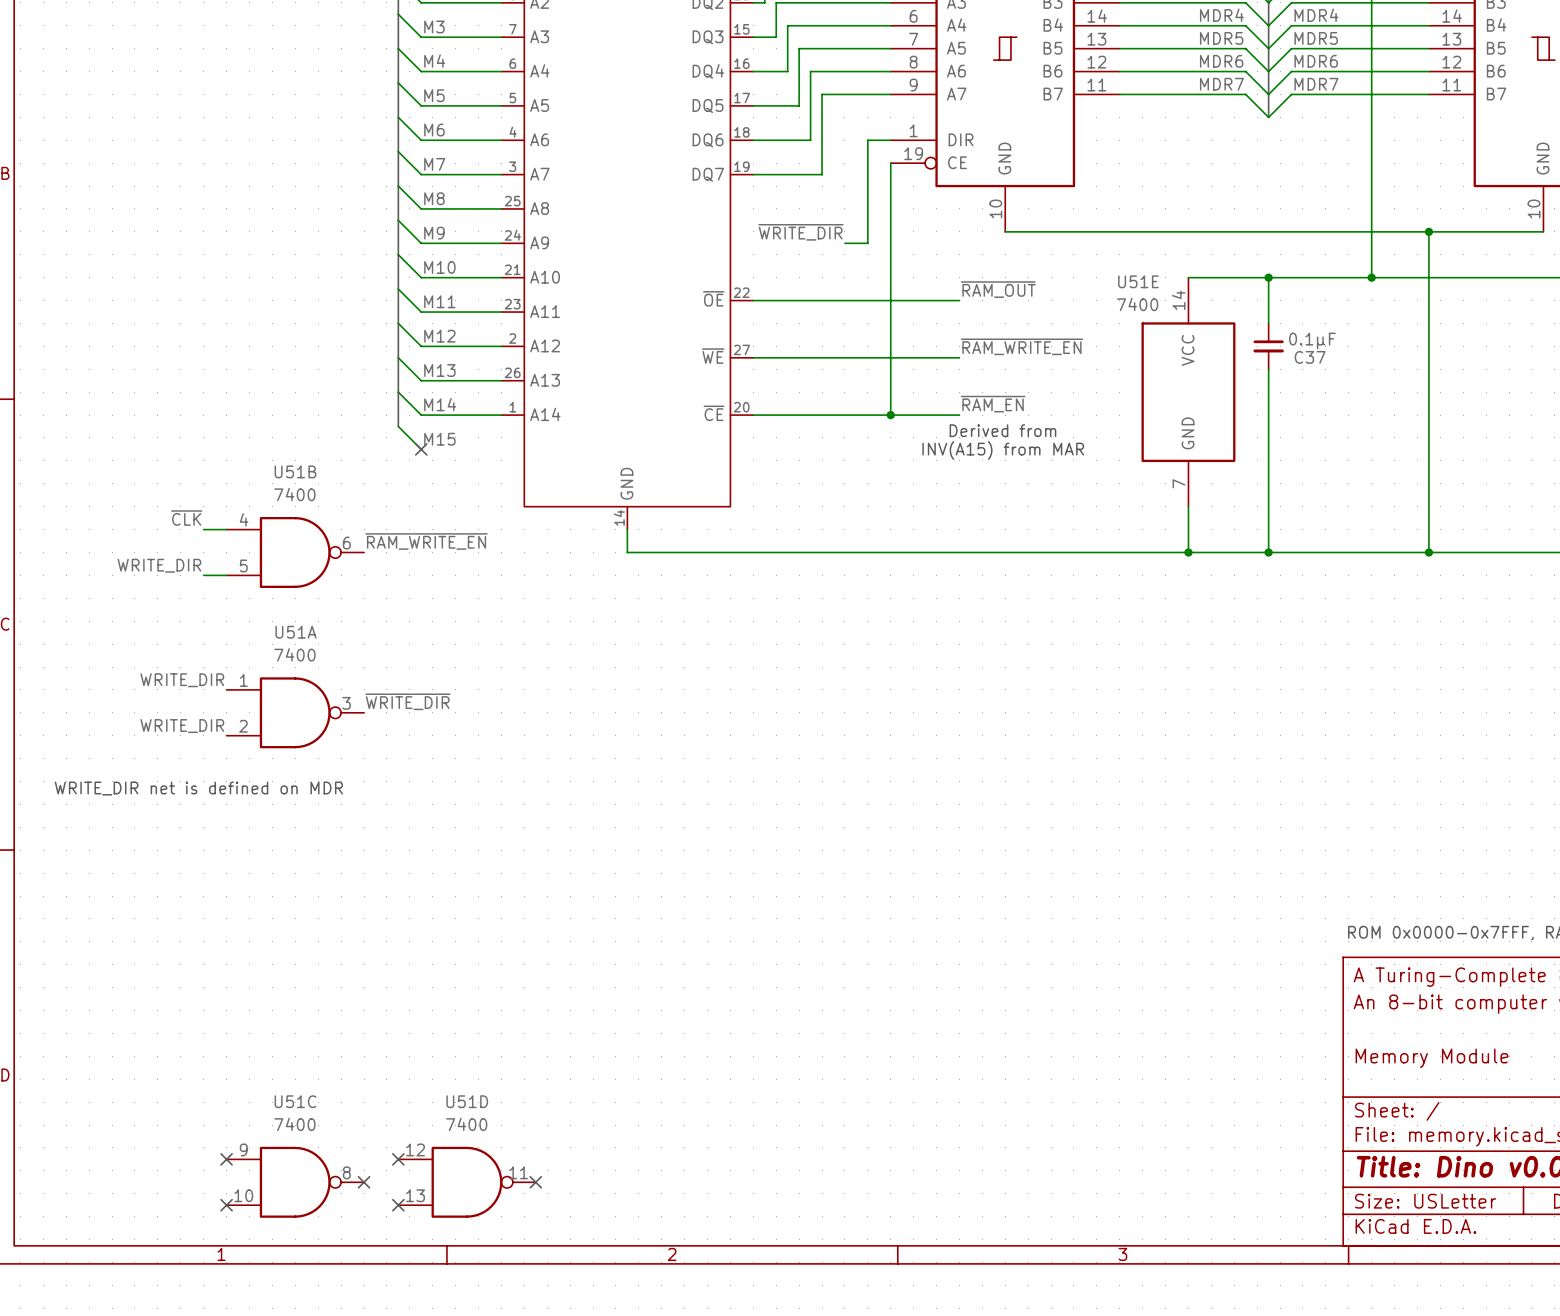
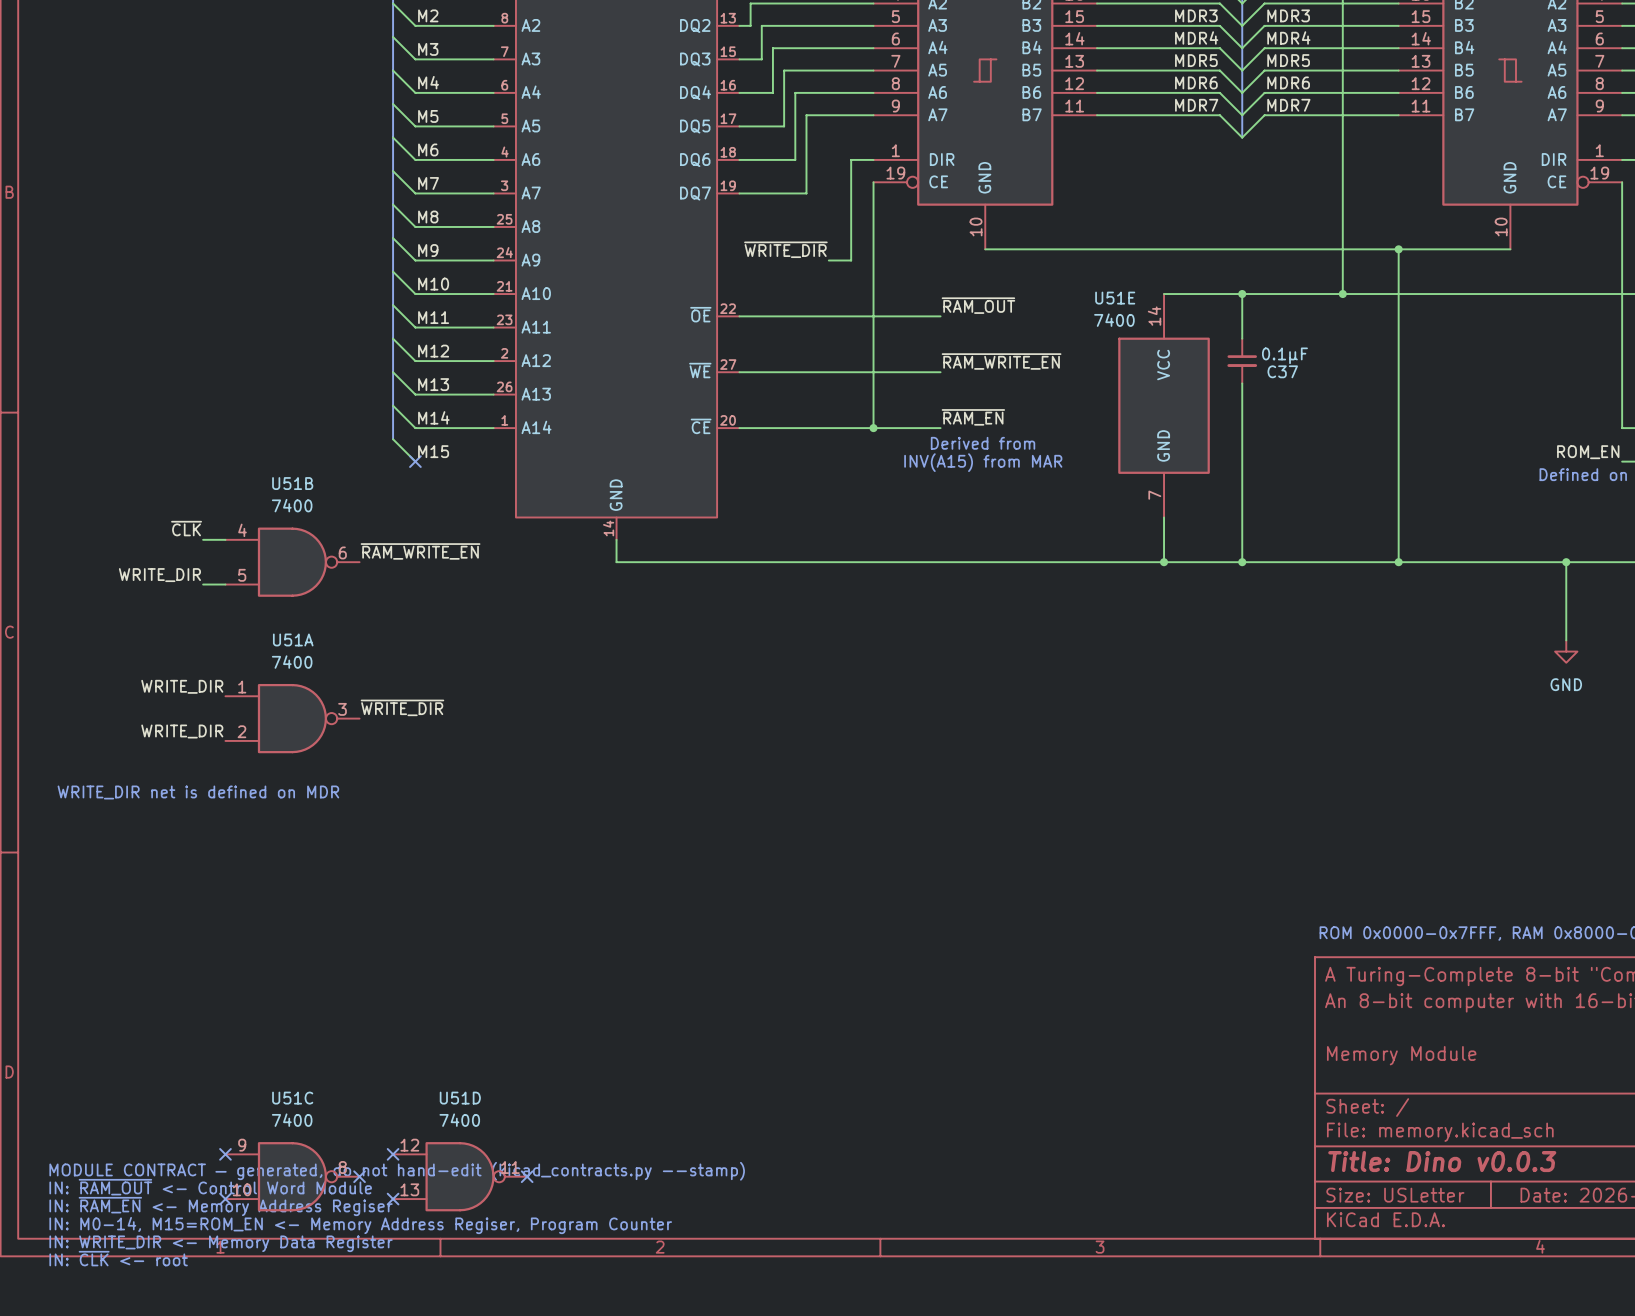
text: none -> MODULE CONTRACT — generated, do not hand-edit (kicad_contracts.py --stamp) (397, 1171)
text: none -> IN: ~{RAM_OUT} <- Control Word Module (210, 1187)
text: none -> IN: ~{RAM_EN} <- Memory Address Regiser (221, 1206)
text: none -> IN: M0-14, M15=ROM_EN <- Memory Address Regiser, Program Counter (360, 1225)
text: none -> IN: WRITE_DIR <- Memory Data Register (221, 1243)
text: none -> IN: ~{CLK} <- root (118, 1258)

